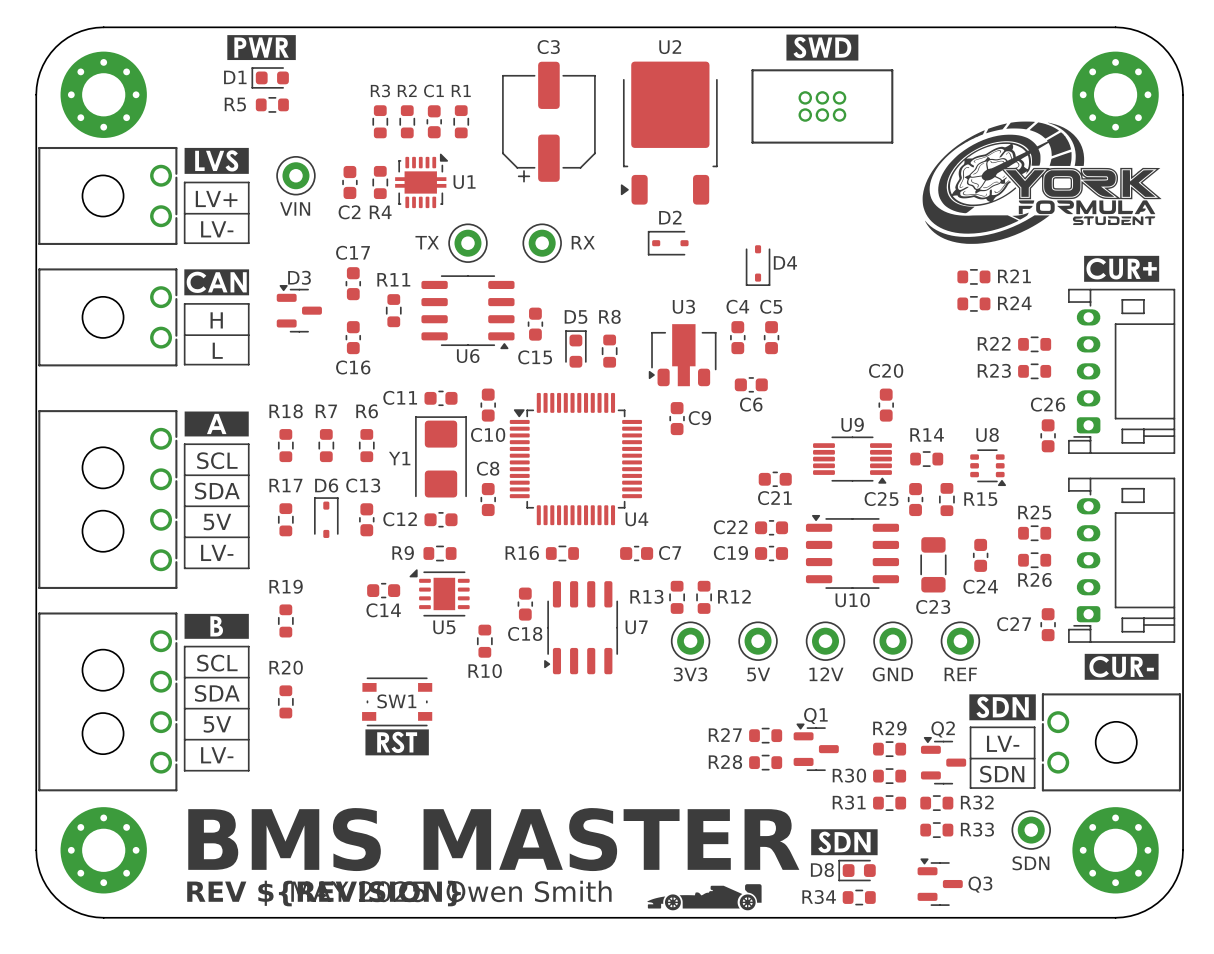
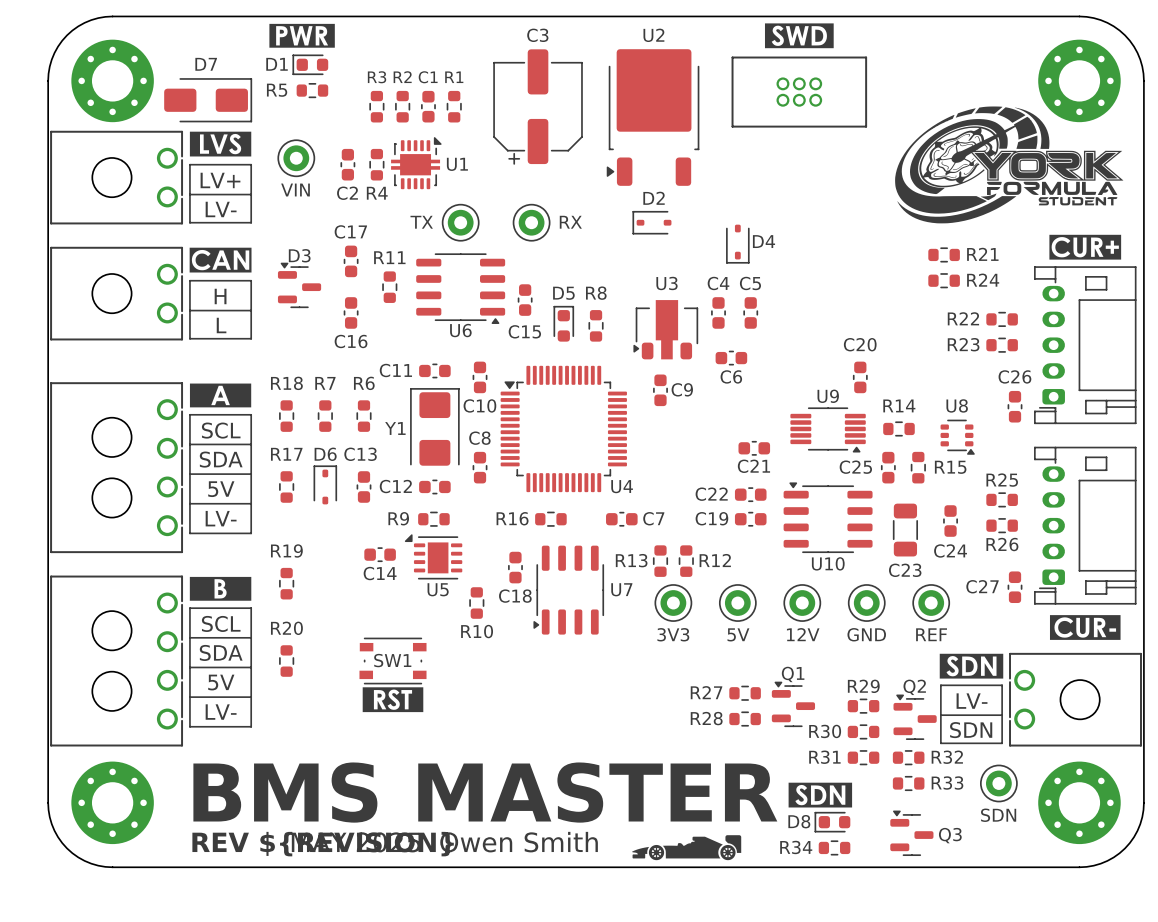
drawing position: (261, 47) -> (302, 35)
D1 position: (270, 77) -> (310, 64)
R5 position: (272, 104) -> (312, 90)
D7: none -> (208, 100)

